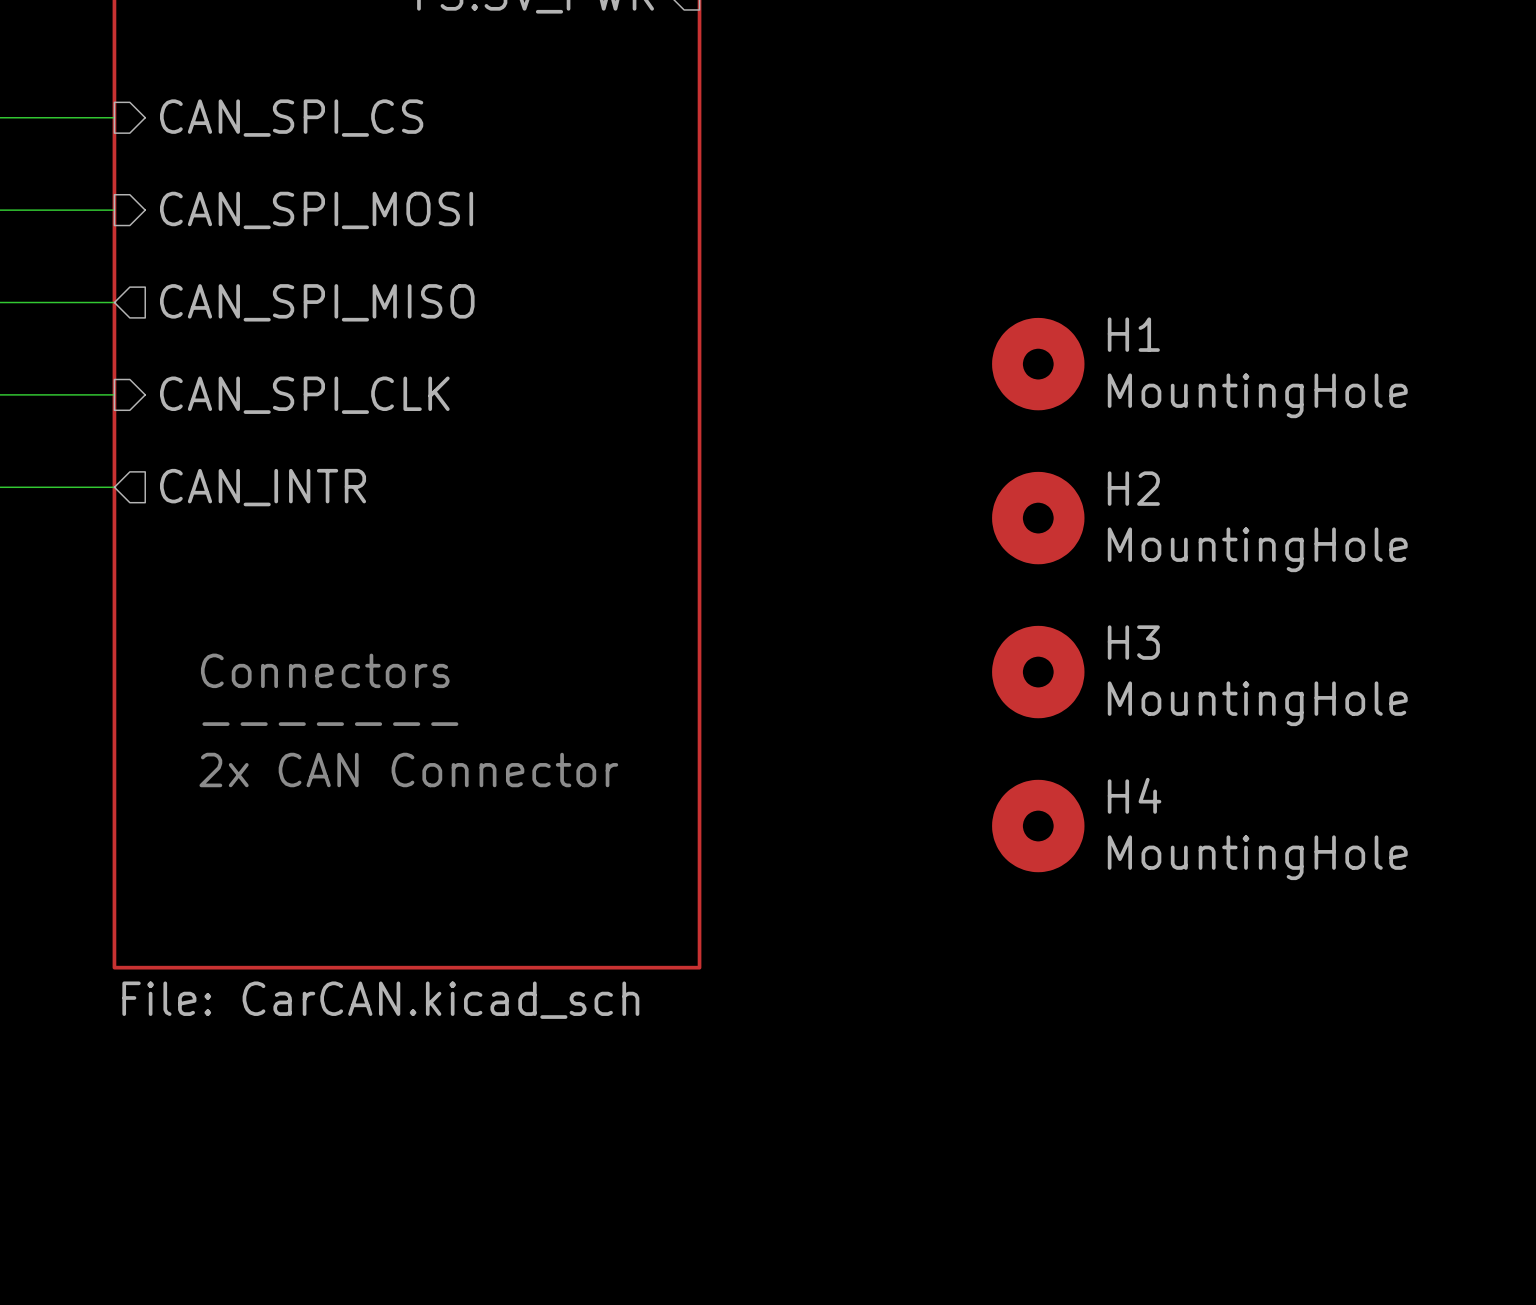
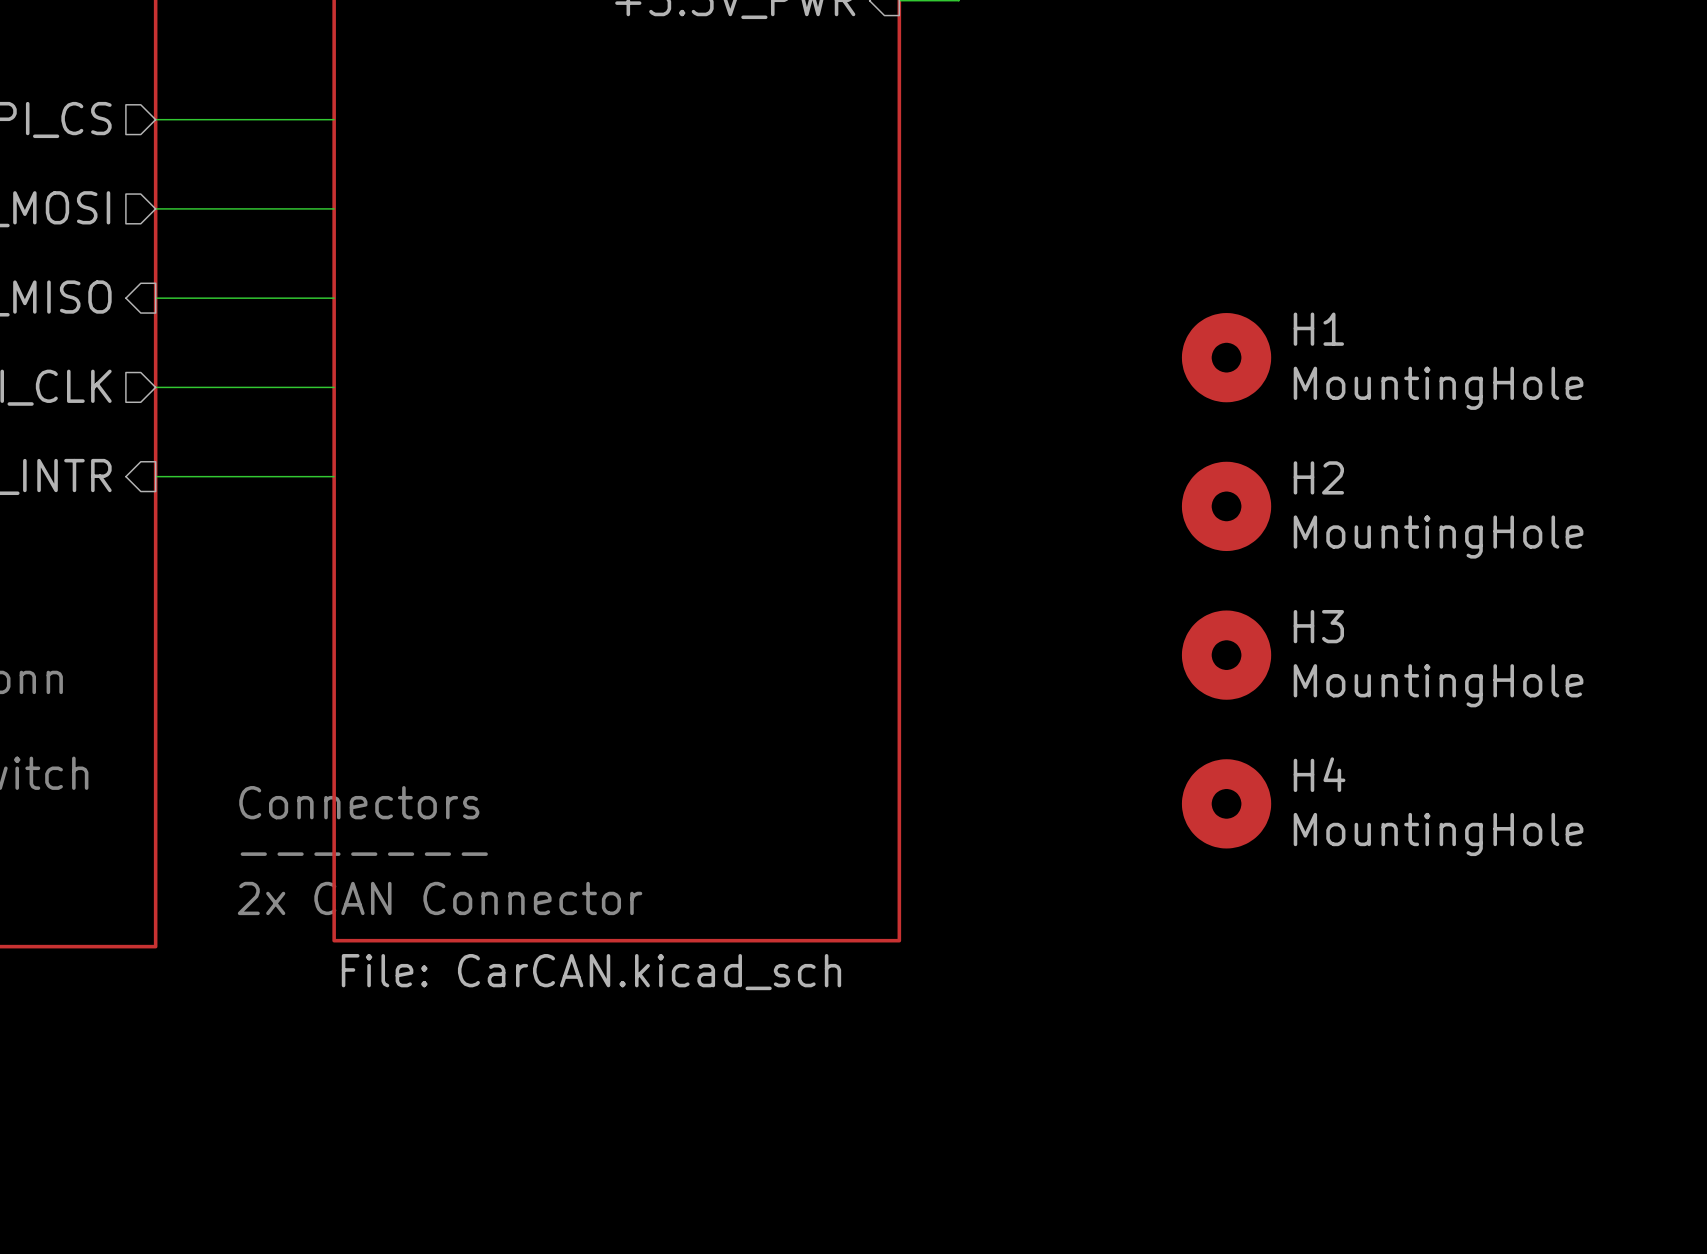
sheet pin: CAN_SPI_CS (291, 118) -> none
sheet pin: CAN_SPI_MOSI (316, 210) -> none
sheet pin: CAN_SPI_MISO (317, 302) -> none
sheet pin: CAN_SPI_CLK (304, 395) -> none
sheet pin: CAN_INTR (263, 487) -> none
text position: Connectors (325, 670) -> Connectors (359, 802)
text position: ------- (330, 724) -> ------- (364, 854)
text position: 2x CAN Connector (408, 770) -> 2x CAN Connector (440, 898)

